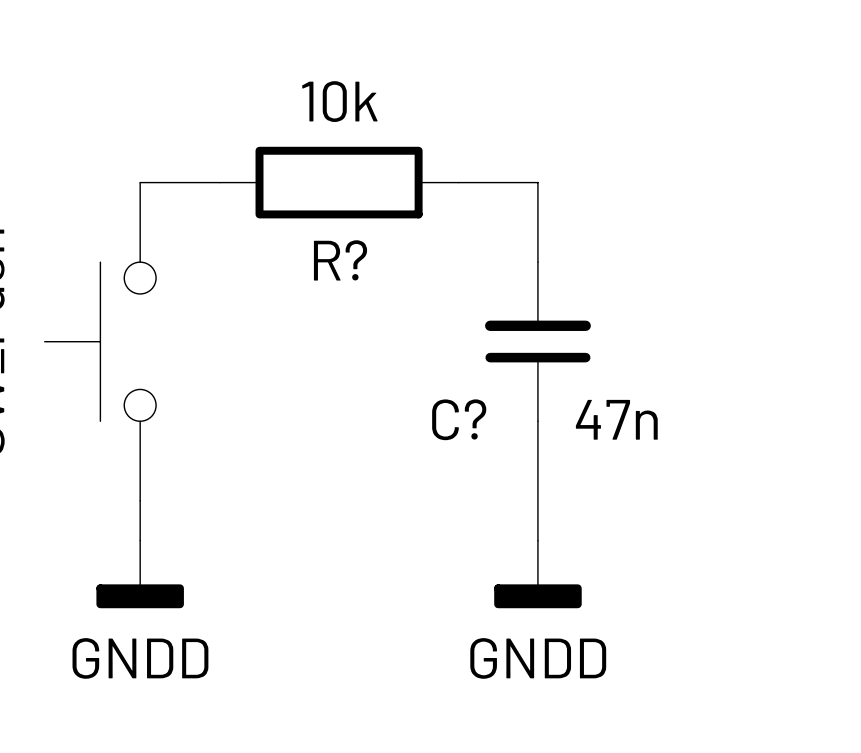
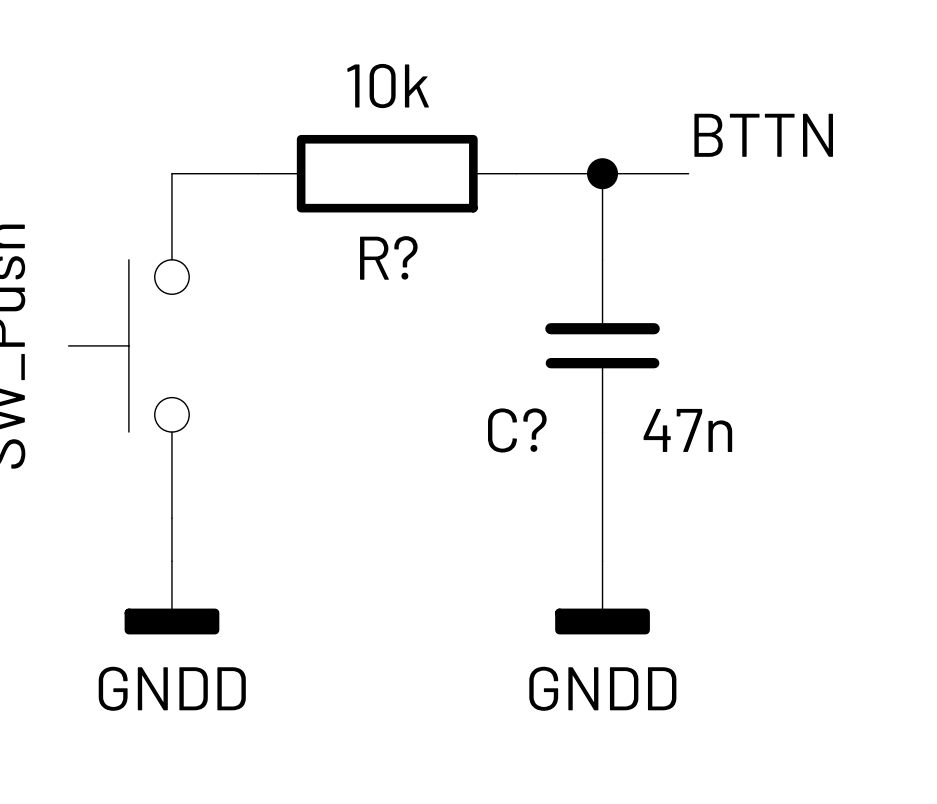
label: none -> BTTN (763, 135)
wire: none -> (602, 173) (688, 173)
junction: none -> (602, 173)

